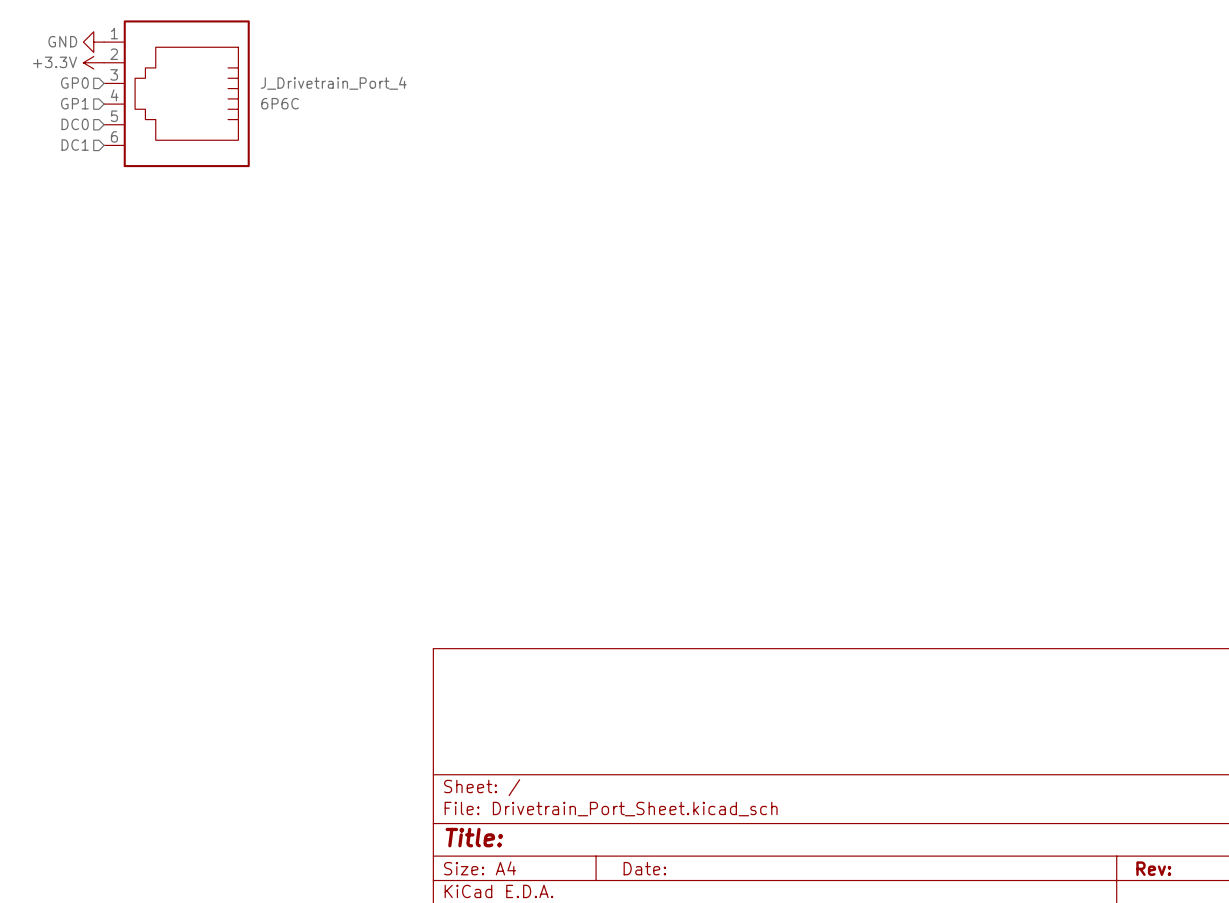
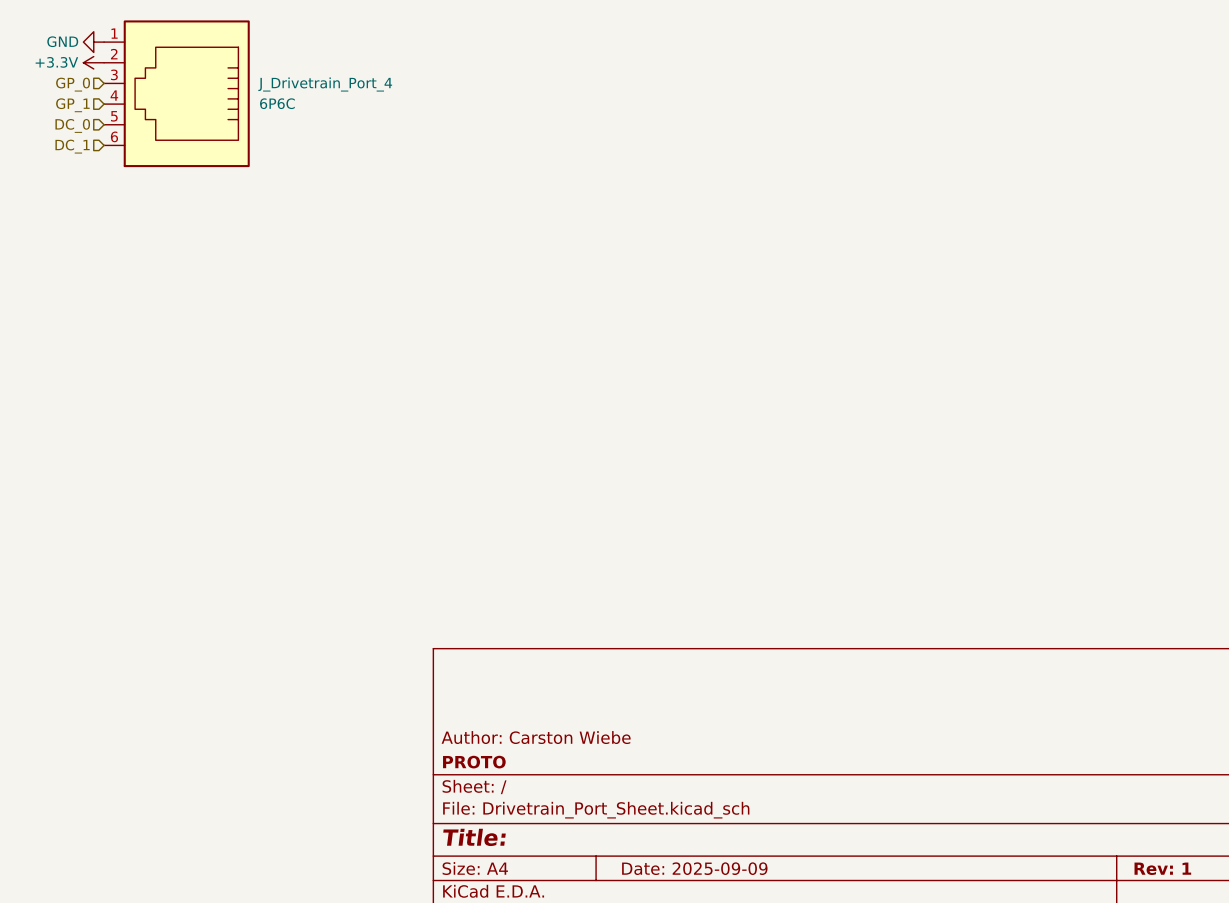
hierarchical label: GP0 (74, 83) -> GP_0 (73, 84)
hierarchical label: GP1 (74, 103) -> GP_1 (72, 105)
hierarchical label: DC0 (75, 124) -> DC_0 (72, 125)
hierarchical label: DC1 (75, 145) -> DC_1 (72, 146)
title block: none -> Author: Carston Wiebe (536, 737)
title block: none -> PROTO (474, 762)
title block: Date: (644, 868) -> Date: 2025-09-09 (694, 868)
title block: Rev: (1153, 868) -> Rev: 1 (1162, 868)

